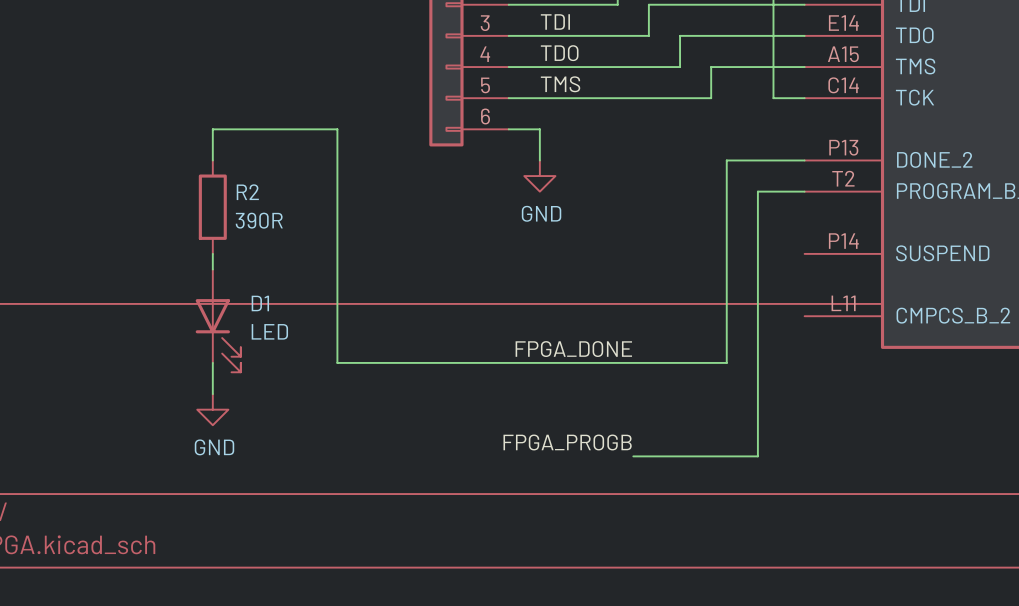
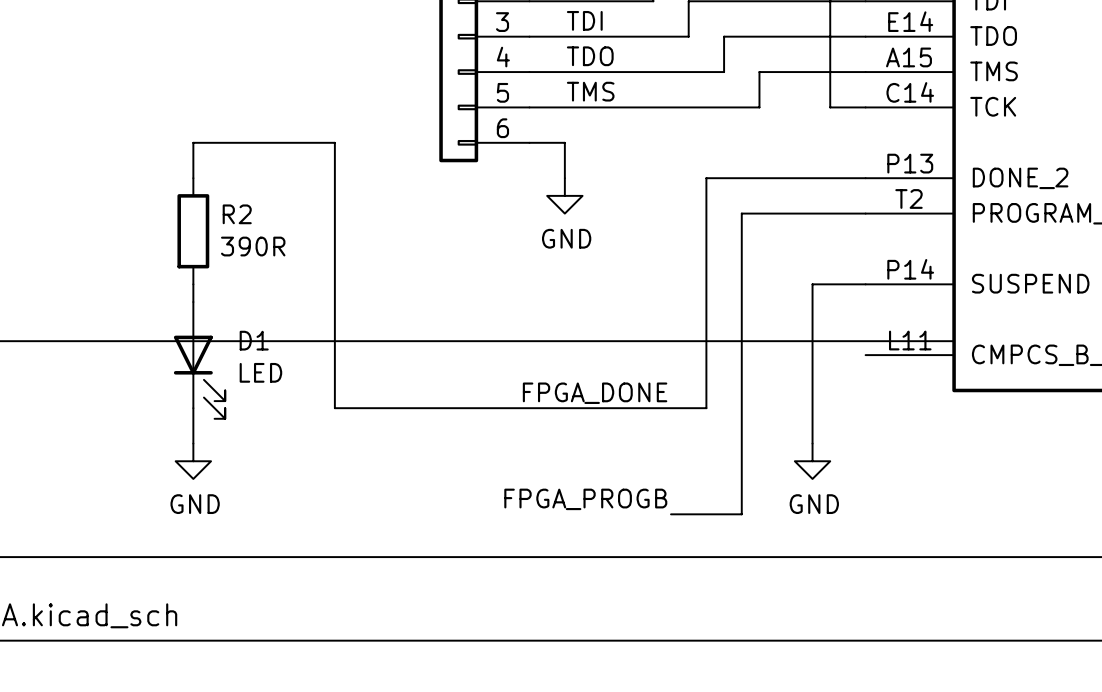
wire: (726, 160) (726, 362) (664, 362) -> (777, 178) (706, 178) (706, 408)
wire: (757, 191) (757, 253) -> (865, 284) (812, 284)
wire: (757, 394) (757, 456) (695, 456) -> (812, 213) (741, 213) (741, 514)
power symbol: none -> GND (812, 461)

